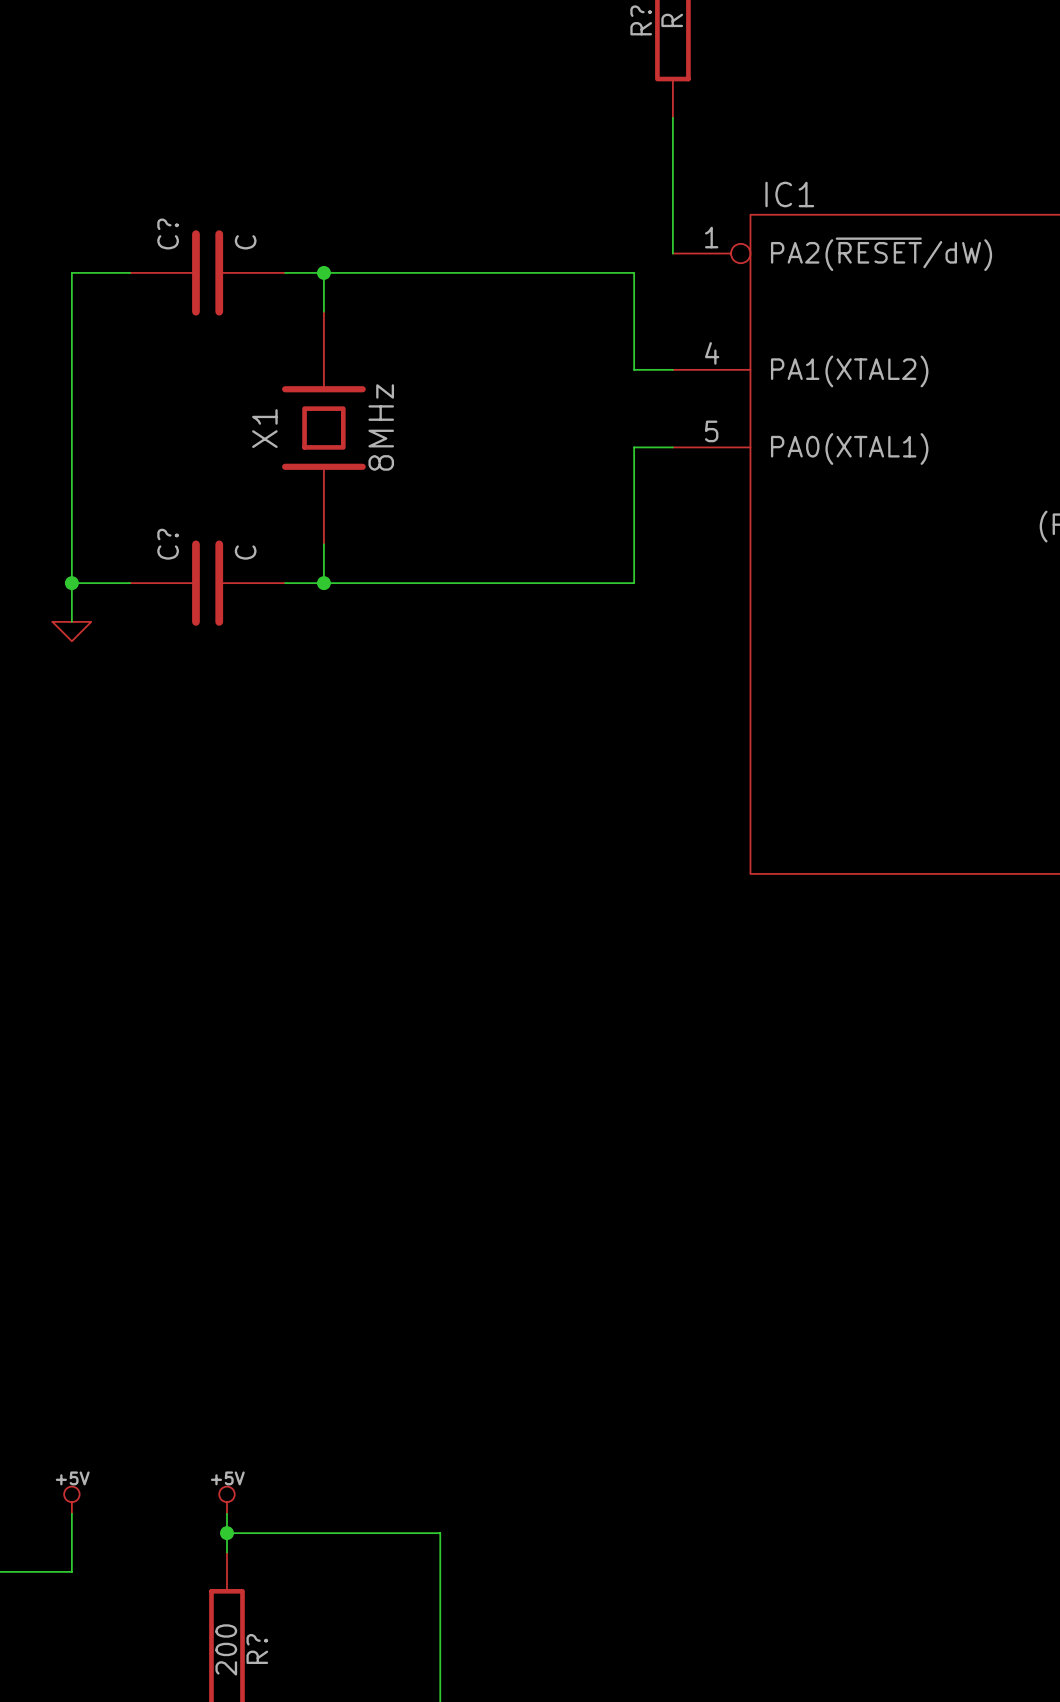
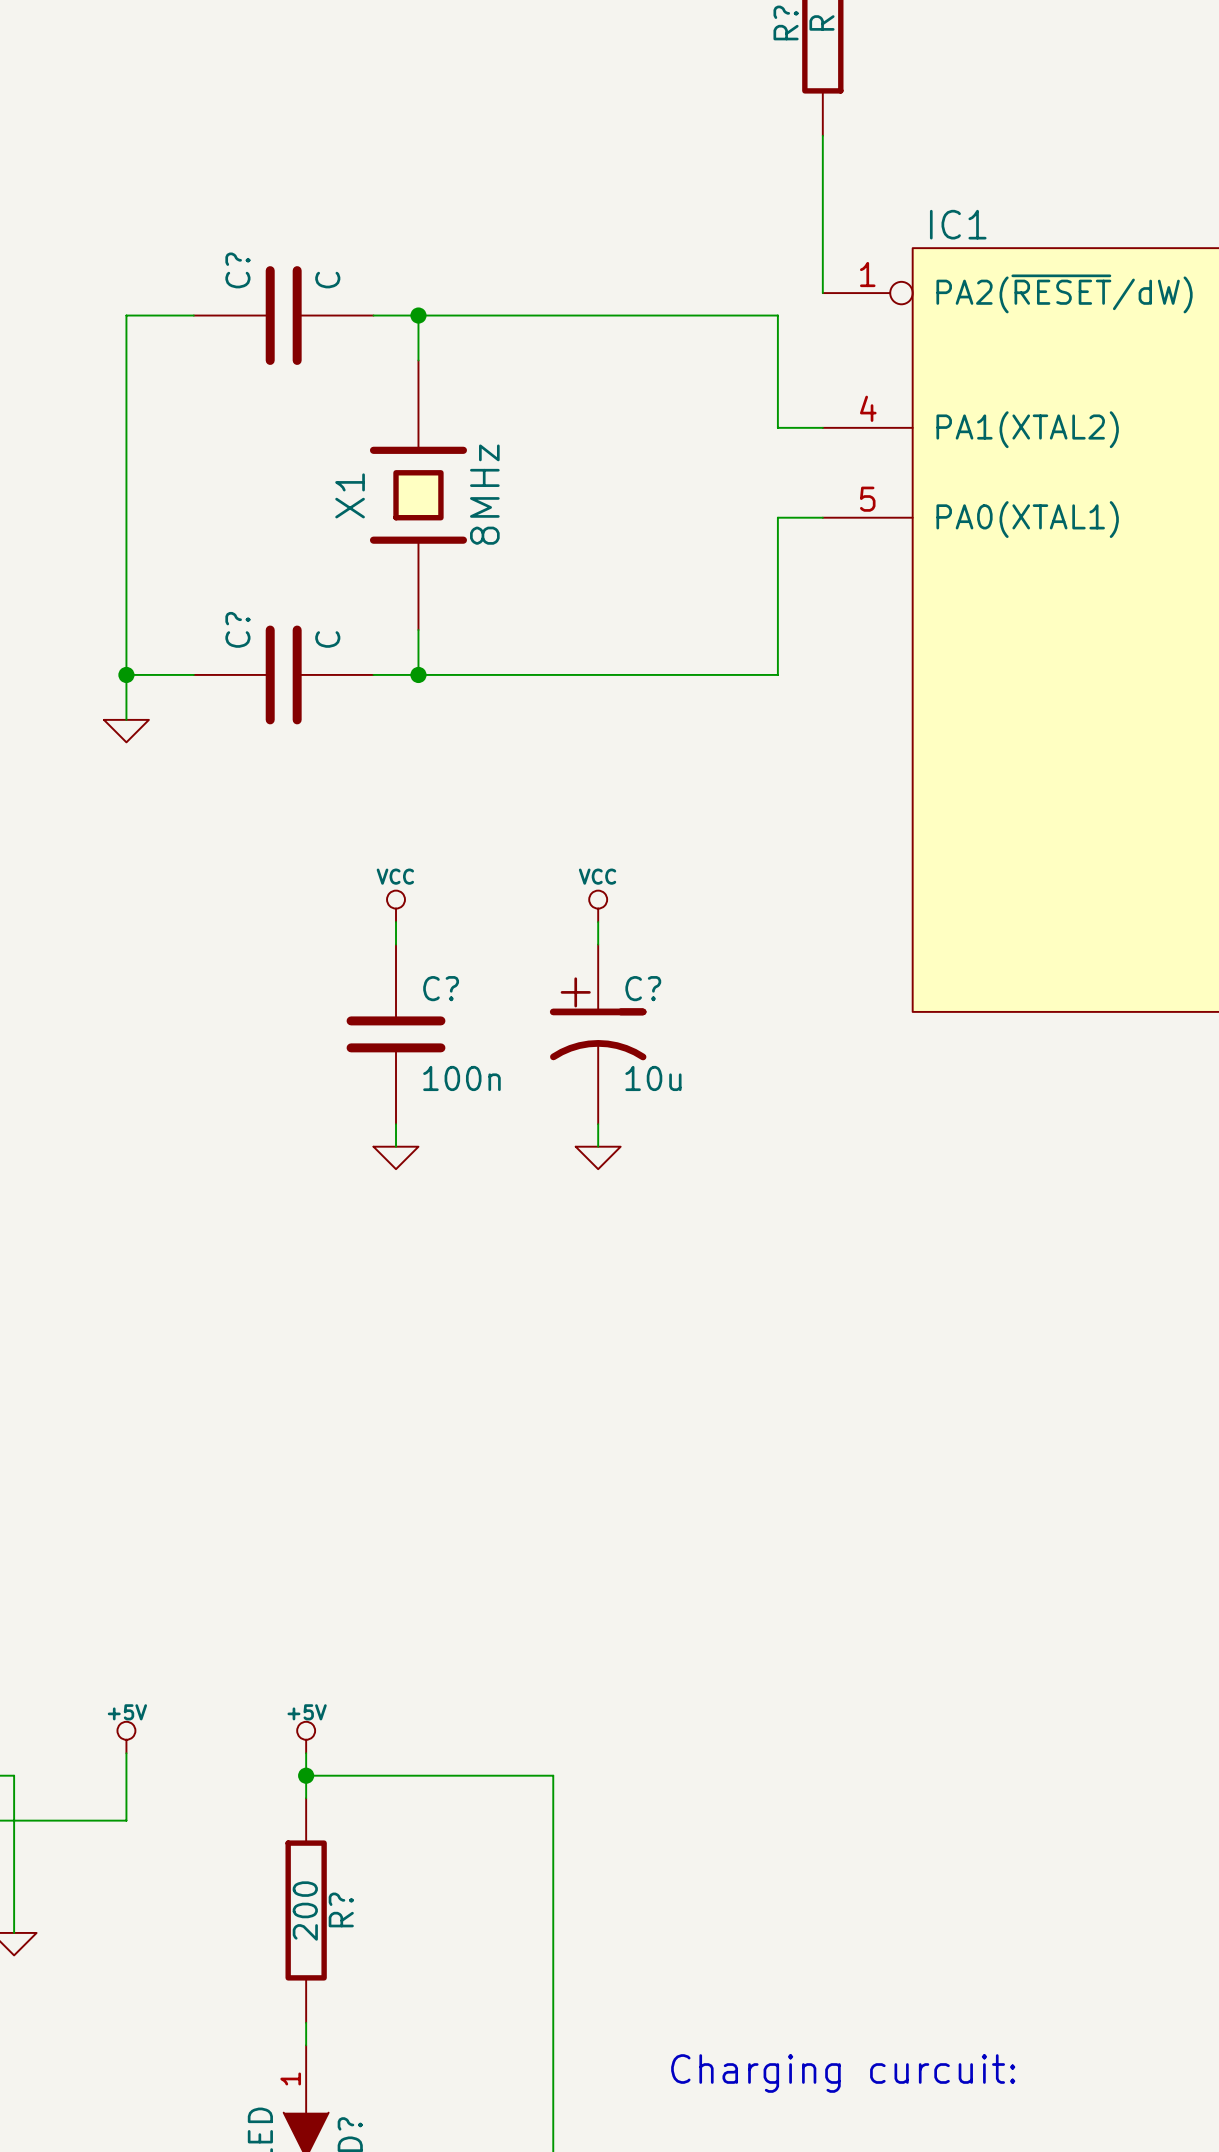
power symbol: none -> VCC (396, 906)
power symbol: none -> VCC (598, 906)
wire: none -> (396, 922) (396, 944)
wire: none -> (598, 922) (598, 944)
C?: none -> 100n (396, 1034)
C?: none -> 10u (598, 1034)
wire: none -> (396, 1124) (396, 1146)
wire: none -> (598, 1124) (598, 1146)
power symbol: none -> (396, 1157)
power symbol: none -> (598, 1157)

